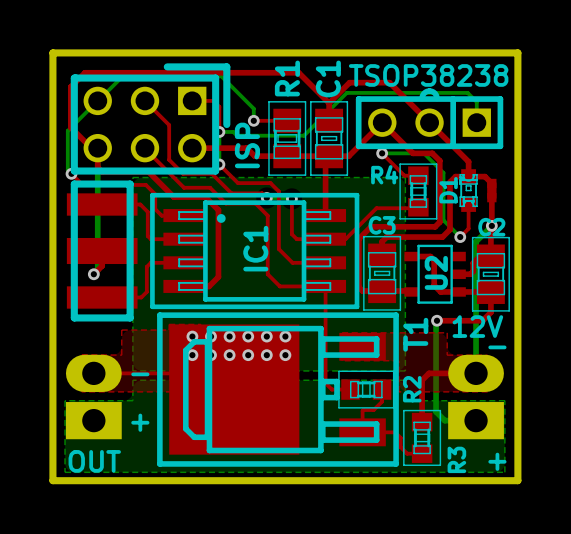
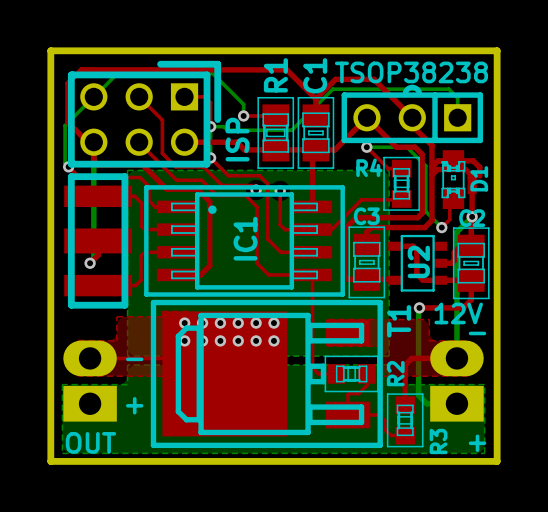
top track: (429, 122) (468, 161) (468, 176) -> (412, 117) (412, 125) (431, 145) (431, 174)
D1 footprint: [459, 169, 478, 212] -> [441, 150, 466, 210]
top track: none -> (431, 167) (438, 160) (473, 160) (479, 167) (479, 175)
D1 name position: D1 (448, 190) -> D1 (479, 178)

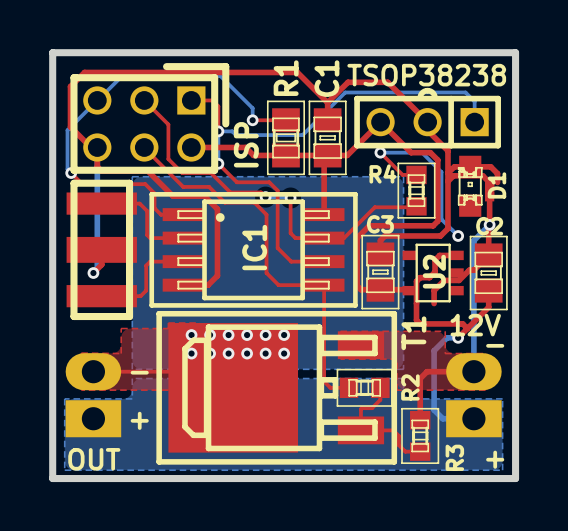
top track: (449, 196) (449, 219) (441, 227) -> none
top track: (395, 246) (413, 246) (416, 249) (416, 273) (423, 280) (471, 280) -> none
top track: none -> (451, 255) (439, 255) (435, 260) (435, 272) (429, 277) (420, 277) (416, 281) (416, 320) (420, 323) (462, 323) (467, 328)
top track: (460, 246) (454, 252) (454, 260) (451, 263) (440, 263) -> none
top track: none -> (488, 255) (473, 270) (469, 270) (459, 280) (444, 280) (434, 290) (434, 303)
top track: (471, 296) (471, 299) (463, 307) (419, 307) -> (488, 307) (458, 337)
bottom track: (419, 307) (418, 338) -> (458, 337) (447, 337) (434, 350)
via position: (419, 307) -> (458, 337)

